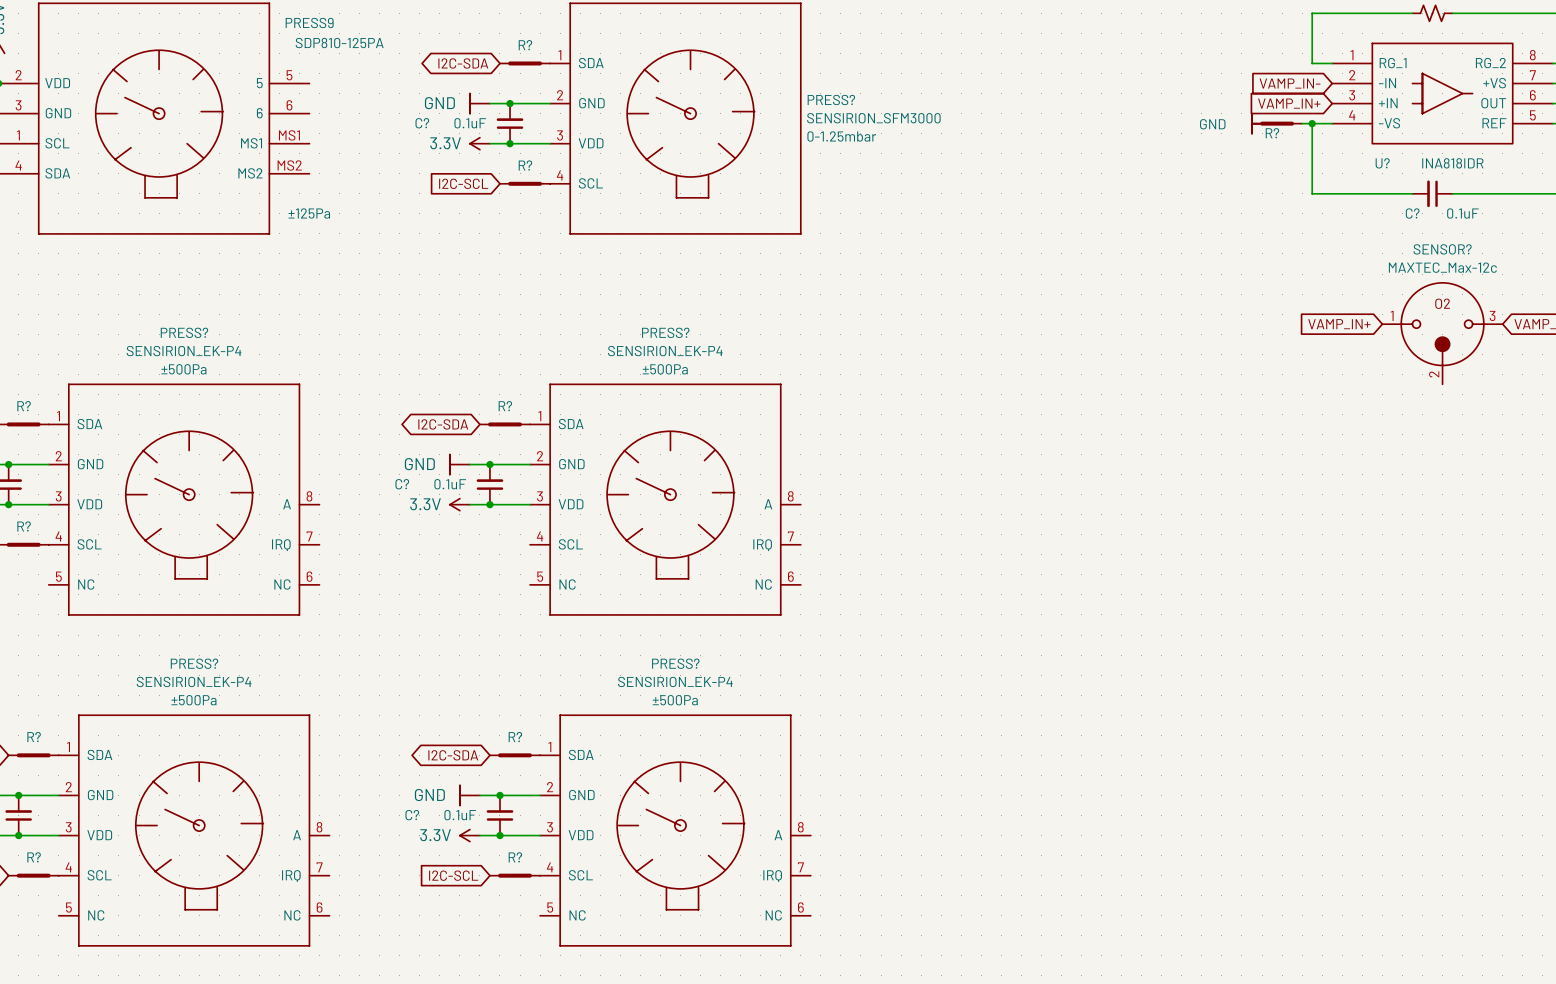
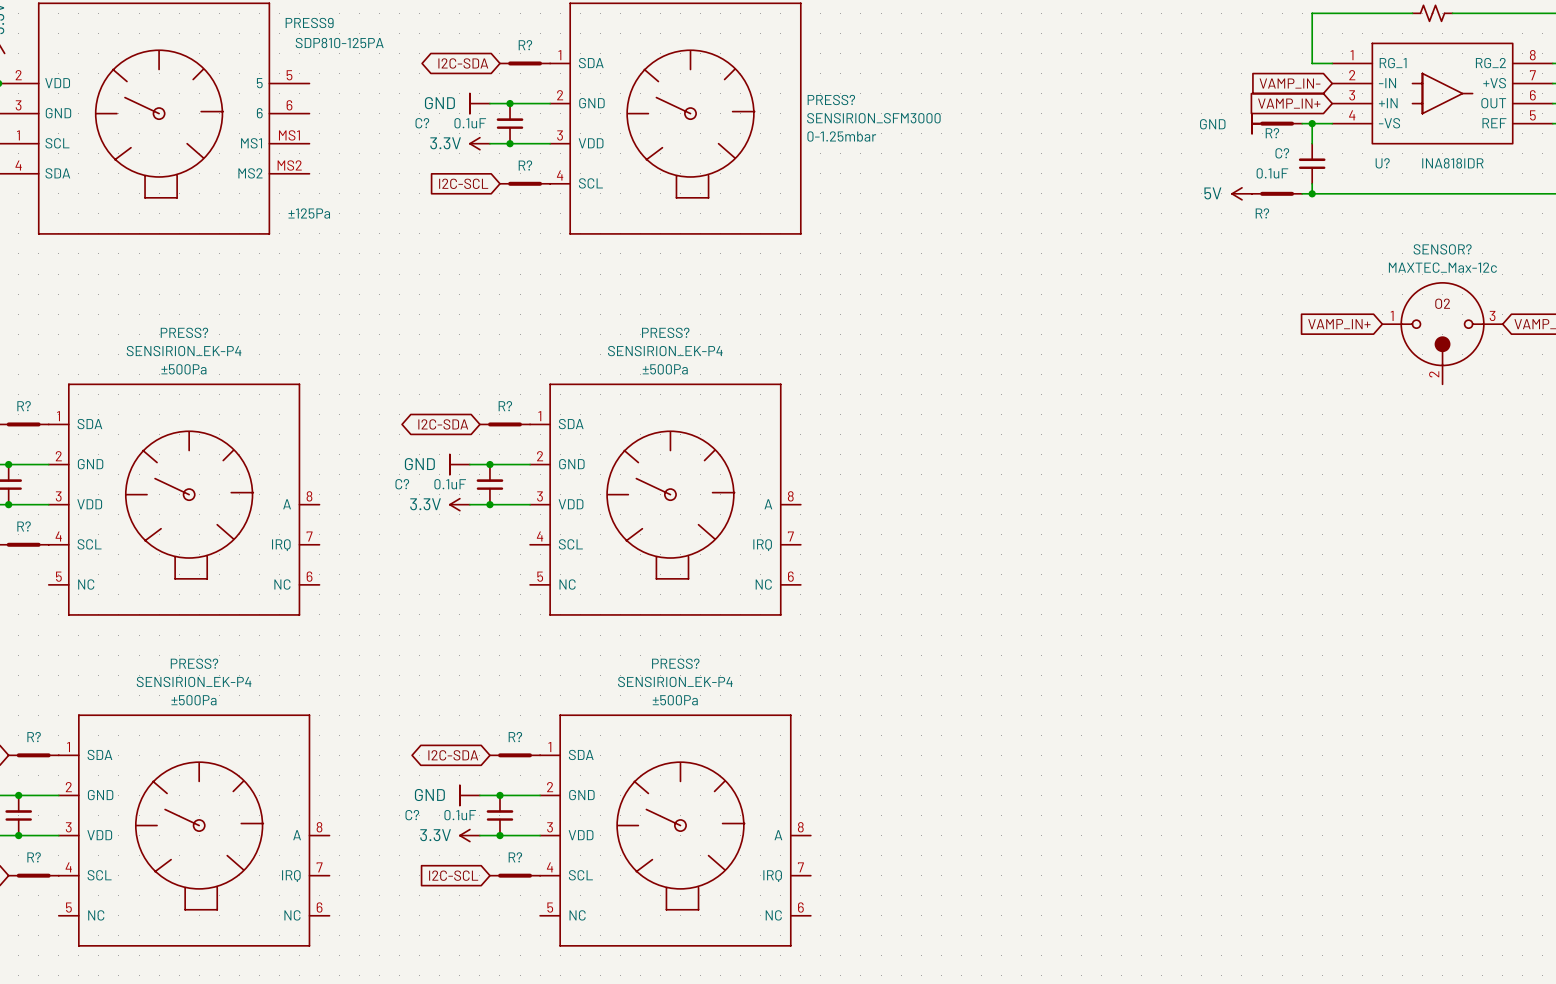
power symbol: none -> 5V (1241, 193)
R?: none -> (1277, 193)
wire: none -> (1302, 193) (1312, 193)
junction: none -> (1312, 193)
C? rotation: 0° (1432, 193) -> 90° clockwise (1312, 163)
C? position: (1432, 193) -> (1312, 163)
C? text position: 0.1uF (1462, 213) -> 0.1uF (1272, 173)

